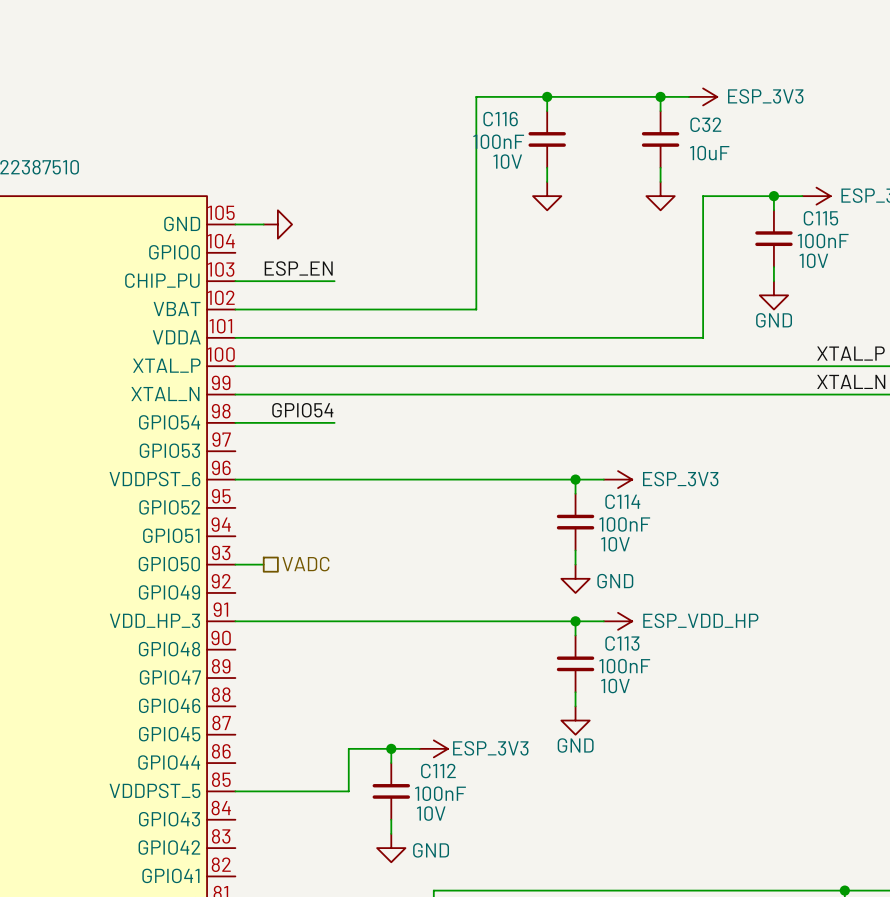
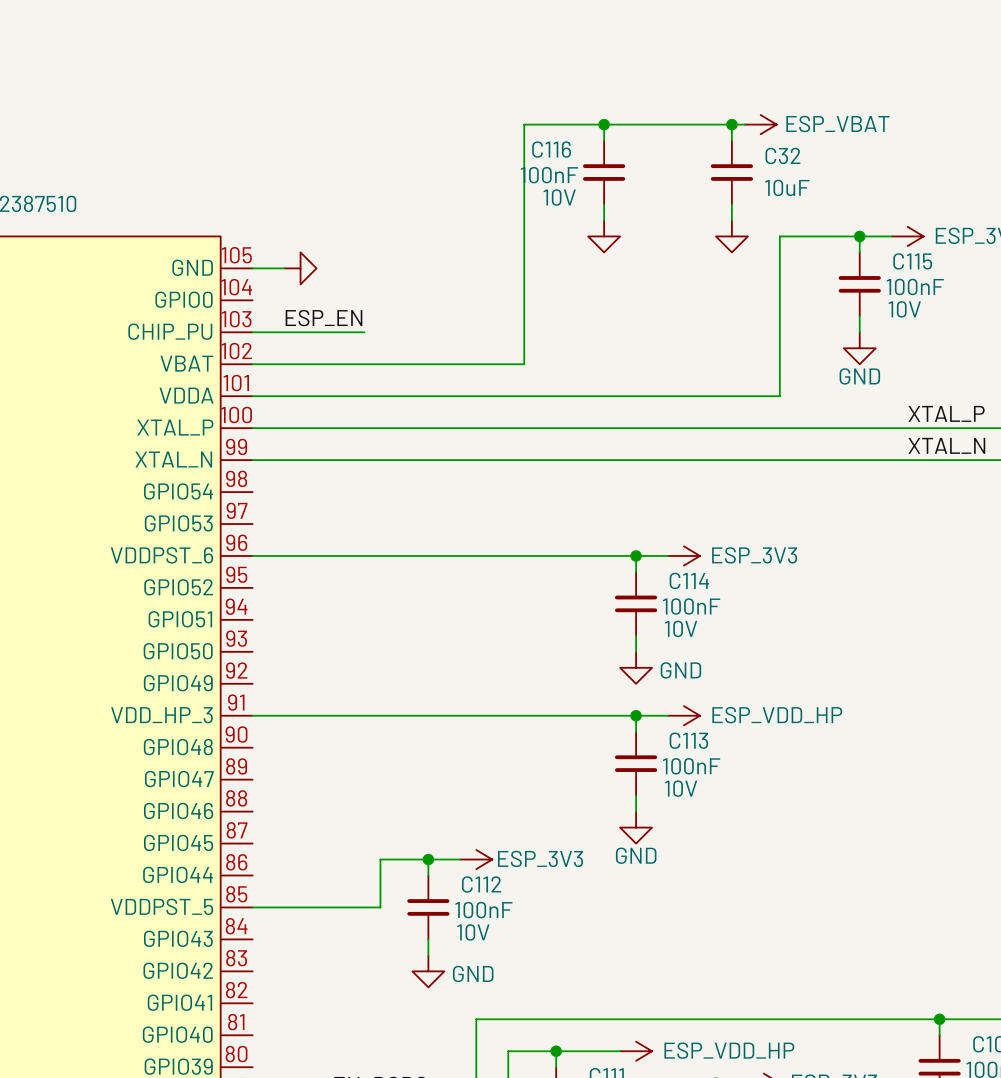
power symbol: none -> ESP_VBAT (760, 124)
power symbol: ESP_3V3 (703, 96) -> none
label: GPIO54 (302, 410) -> none
wire: (235, 422) (334, 422) -> none
wire: (235, 564) (263, 564) -> none
hierarchical label: VADC (305, 564) -> none

